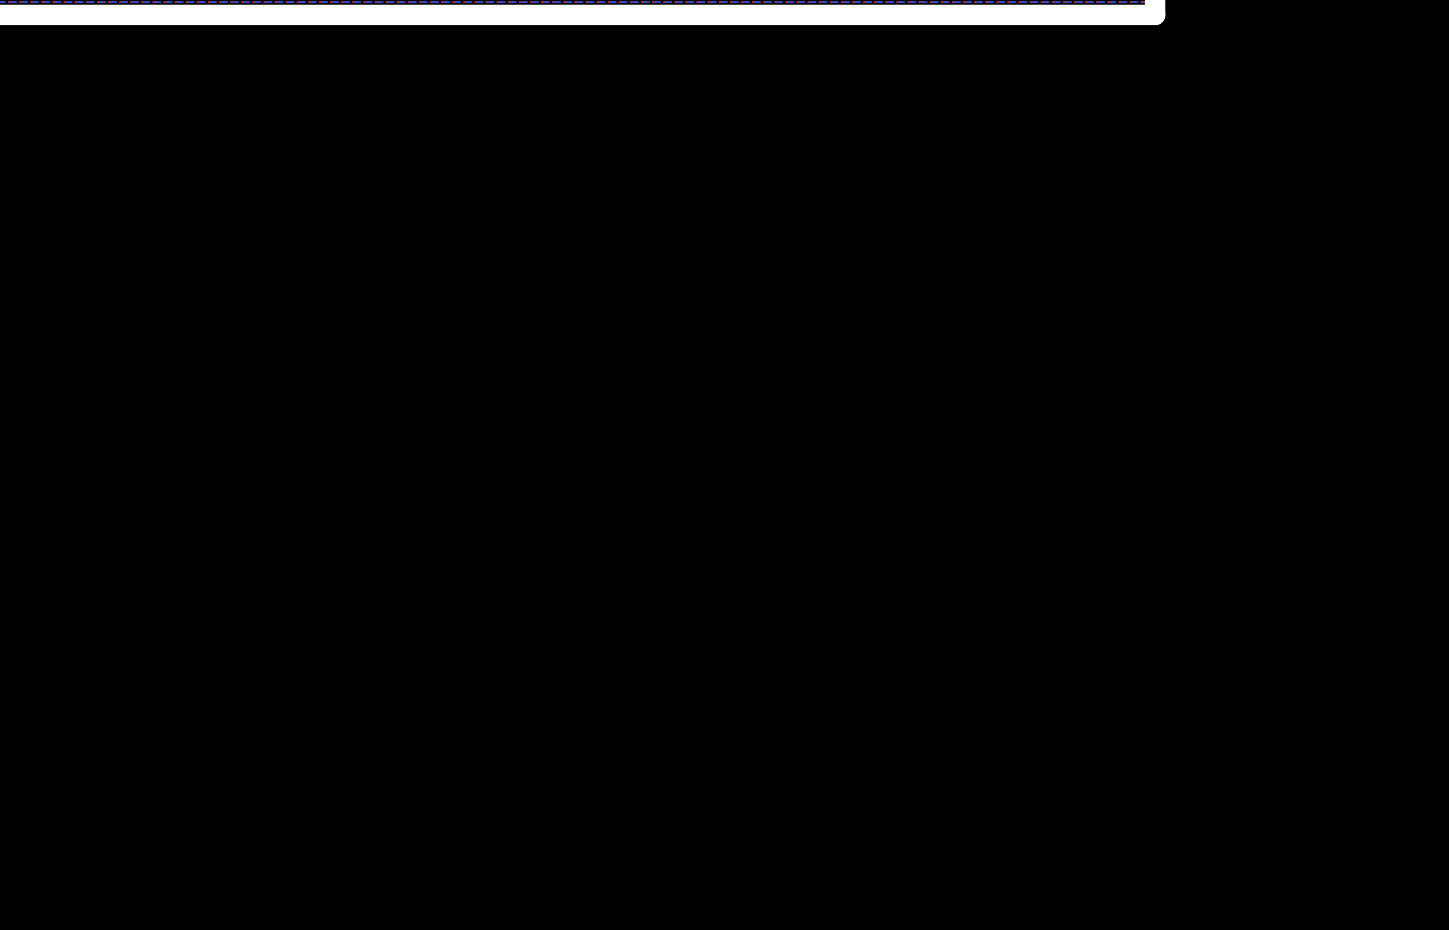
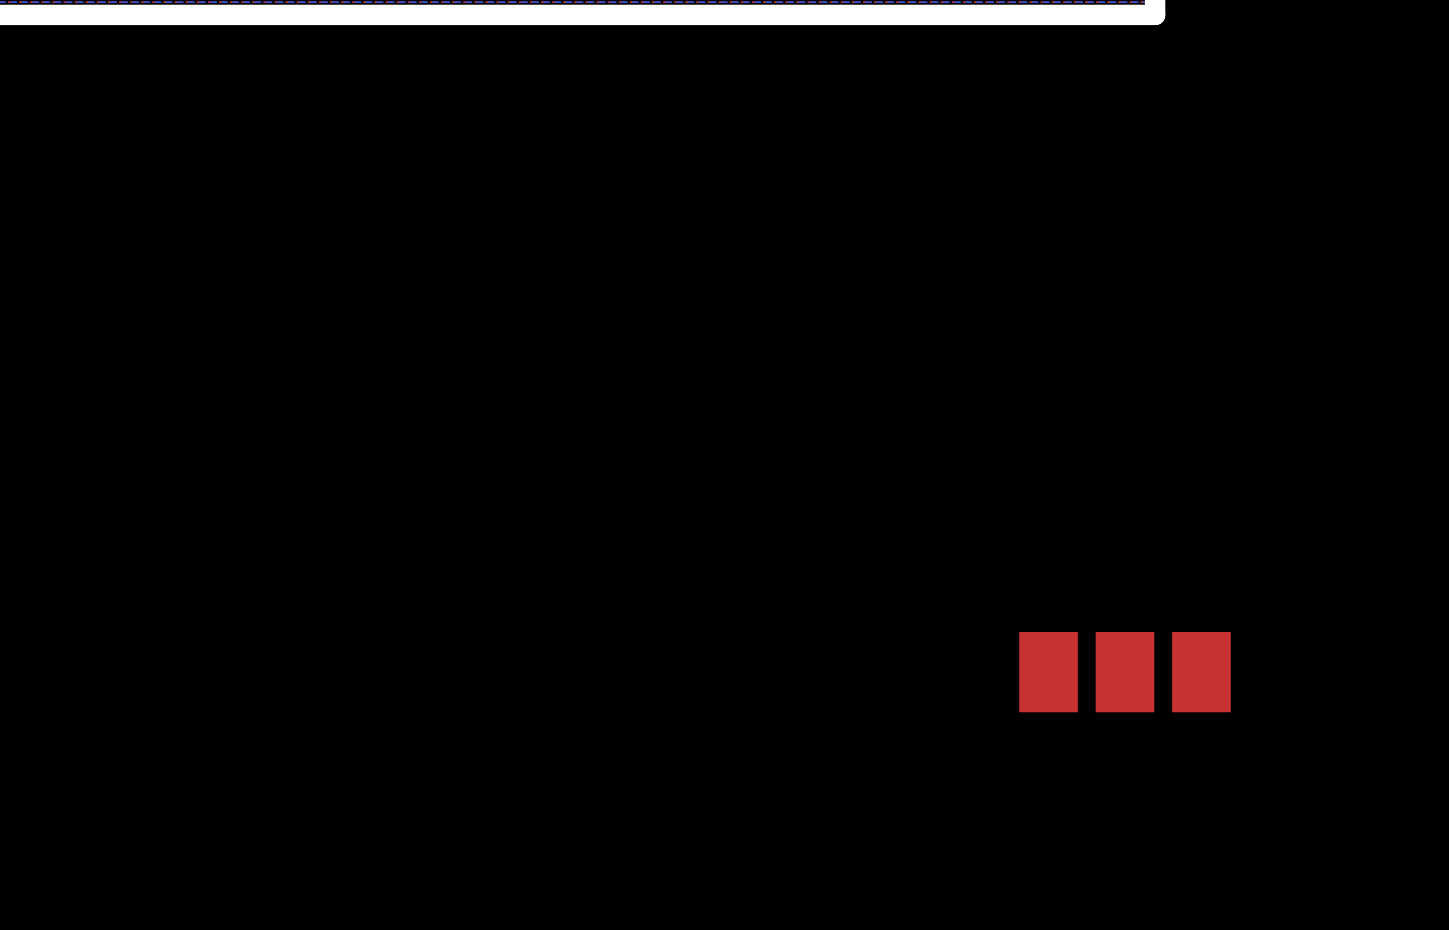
part: none -> (1125, 672)

